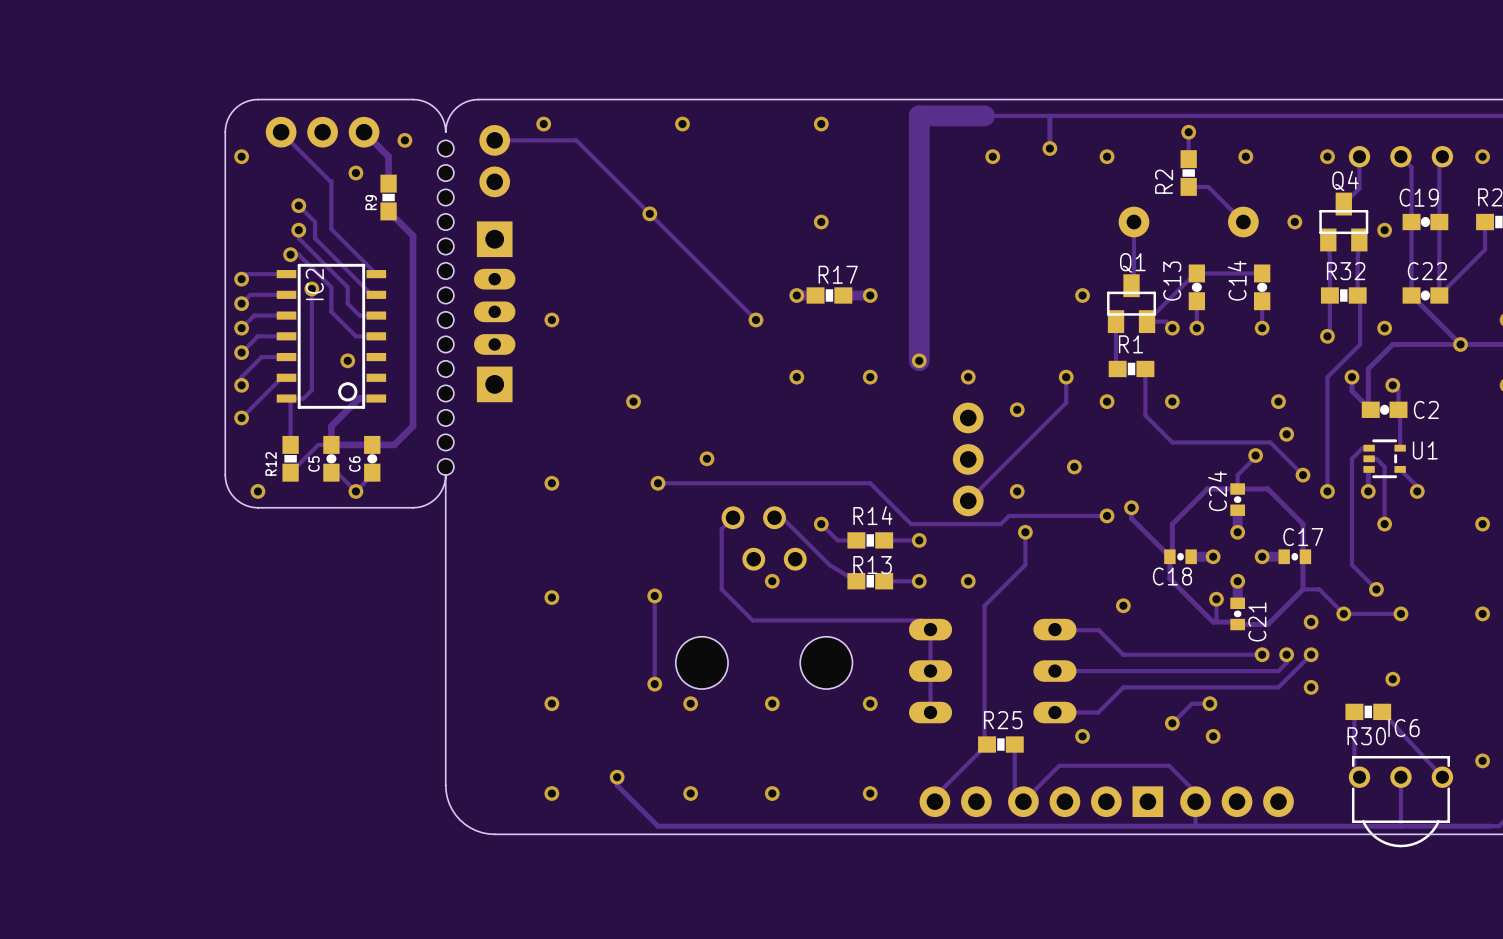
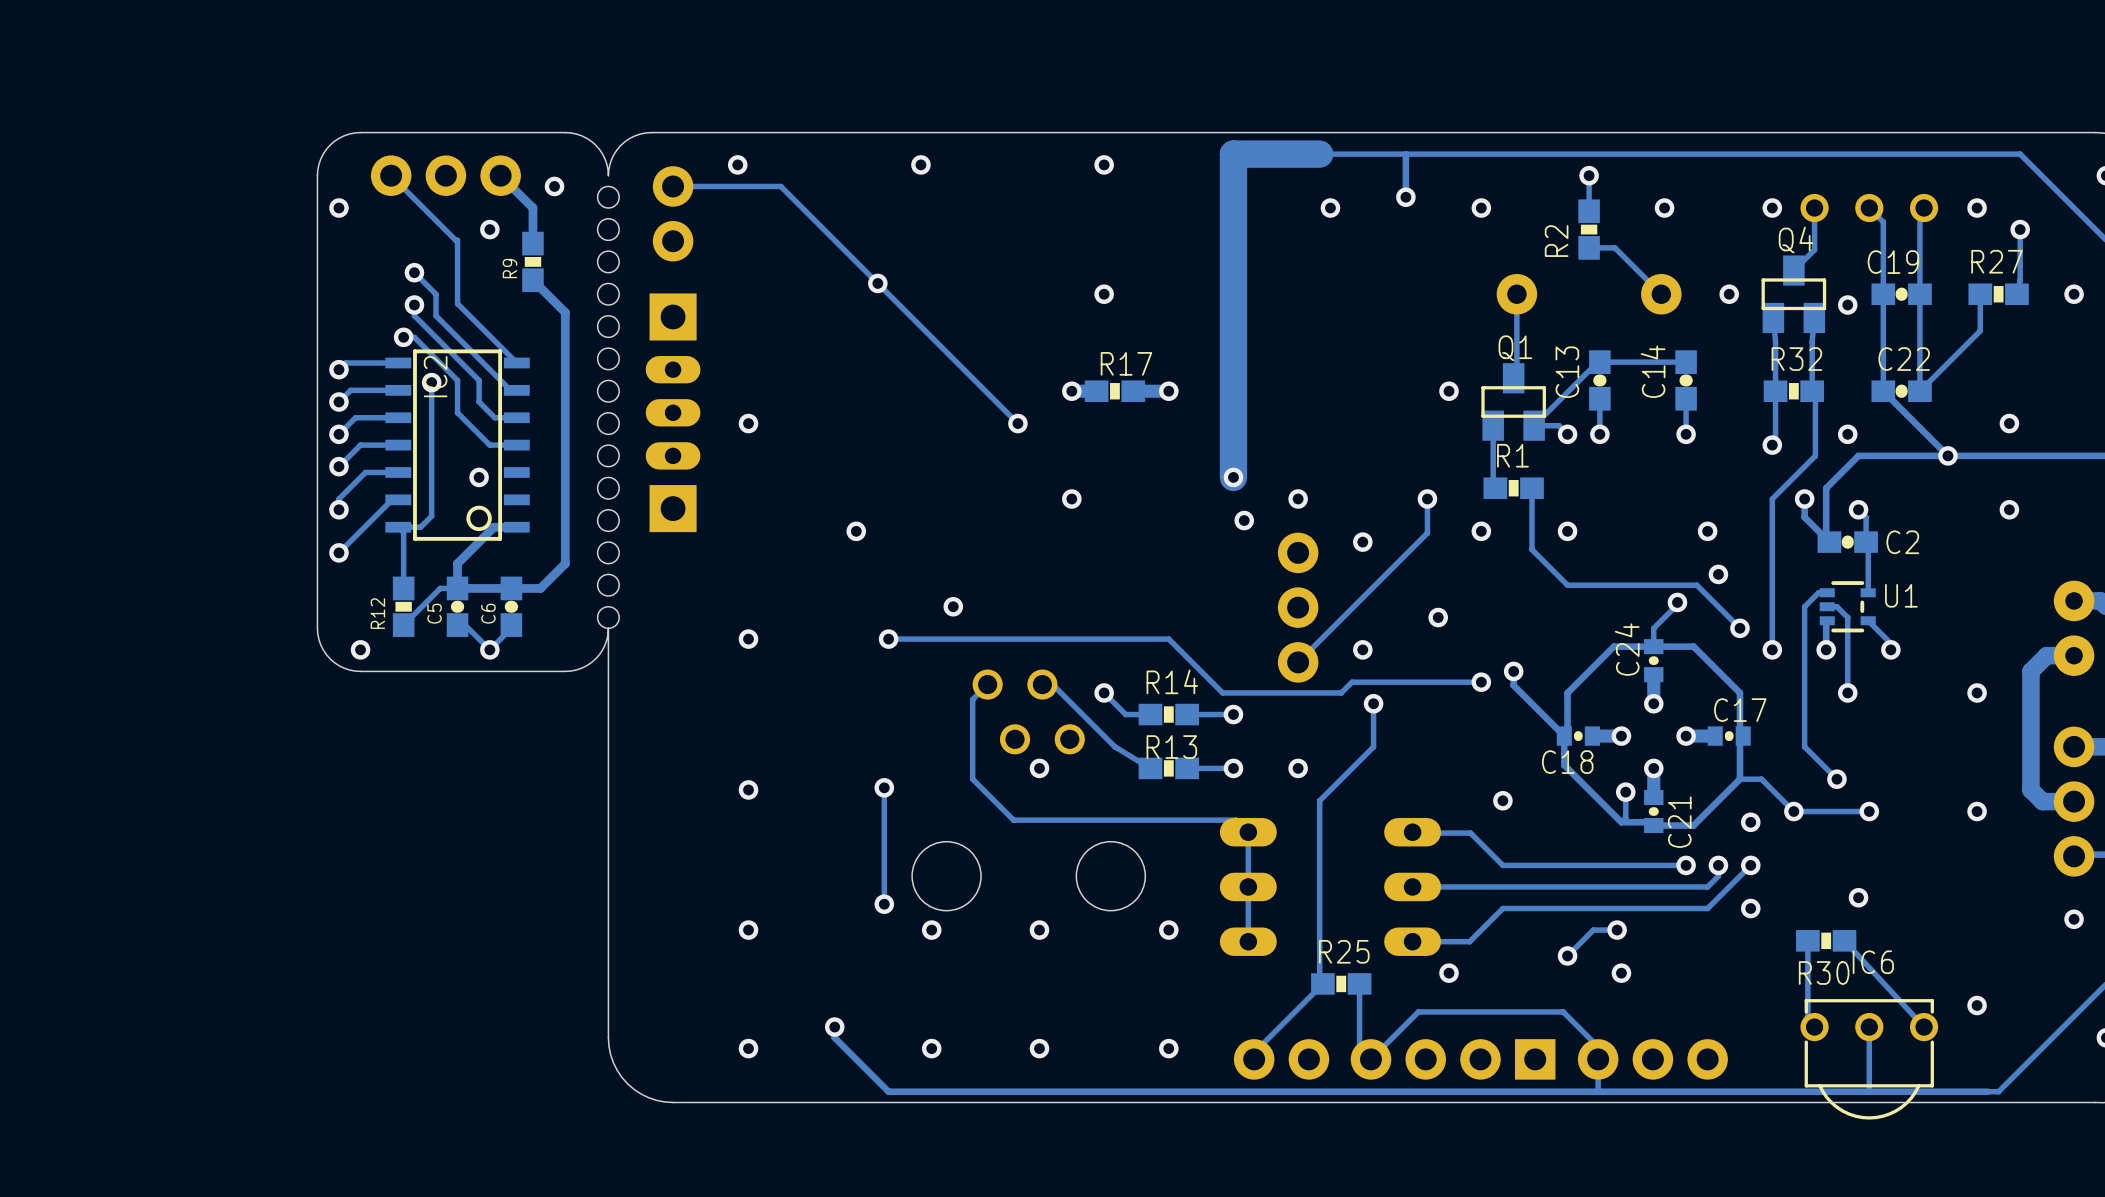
via position: (870, 377) -> (1244, 520)

